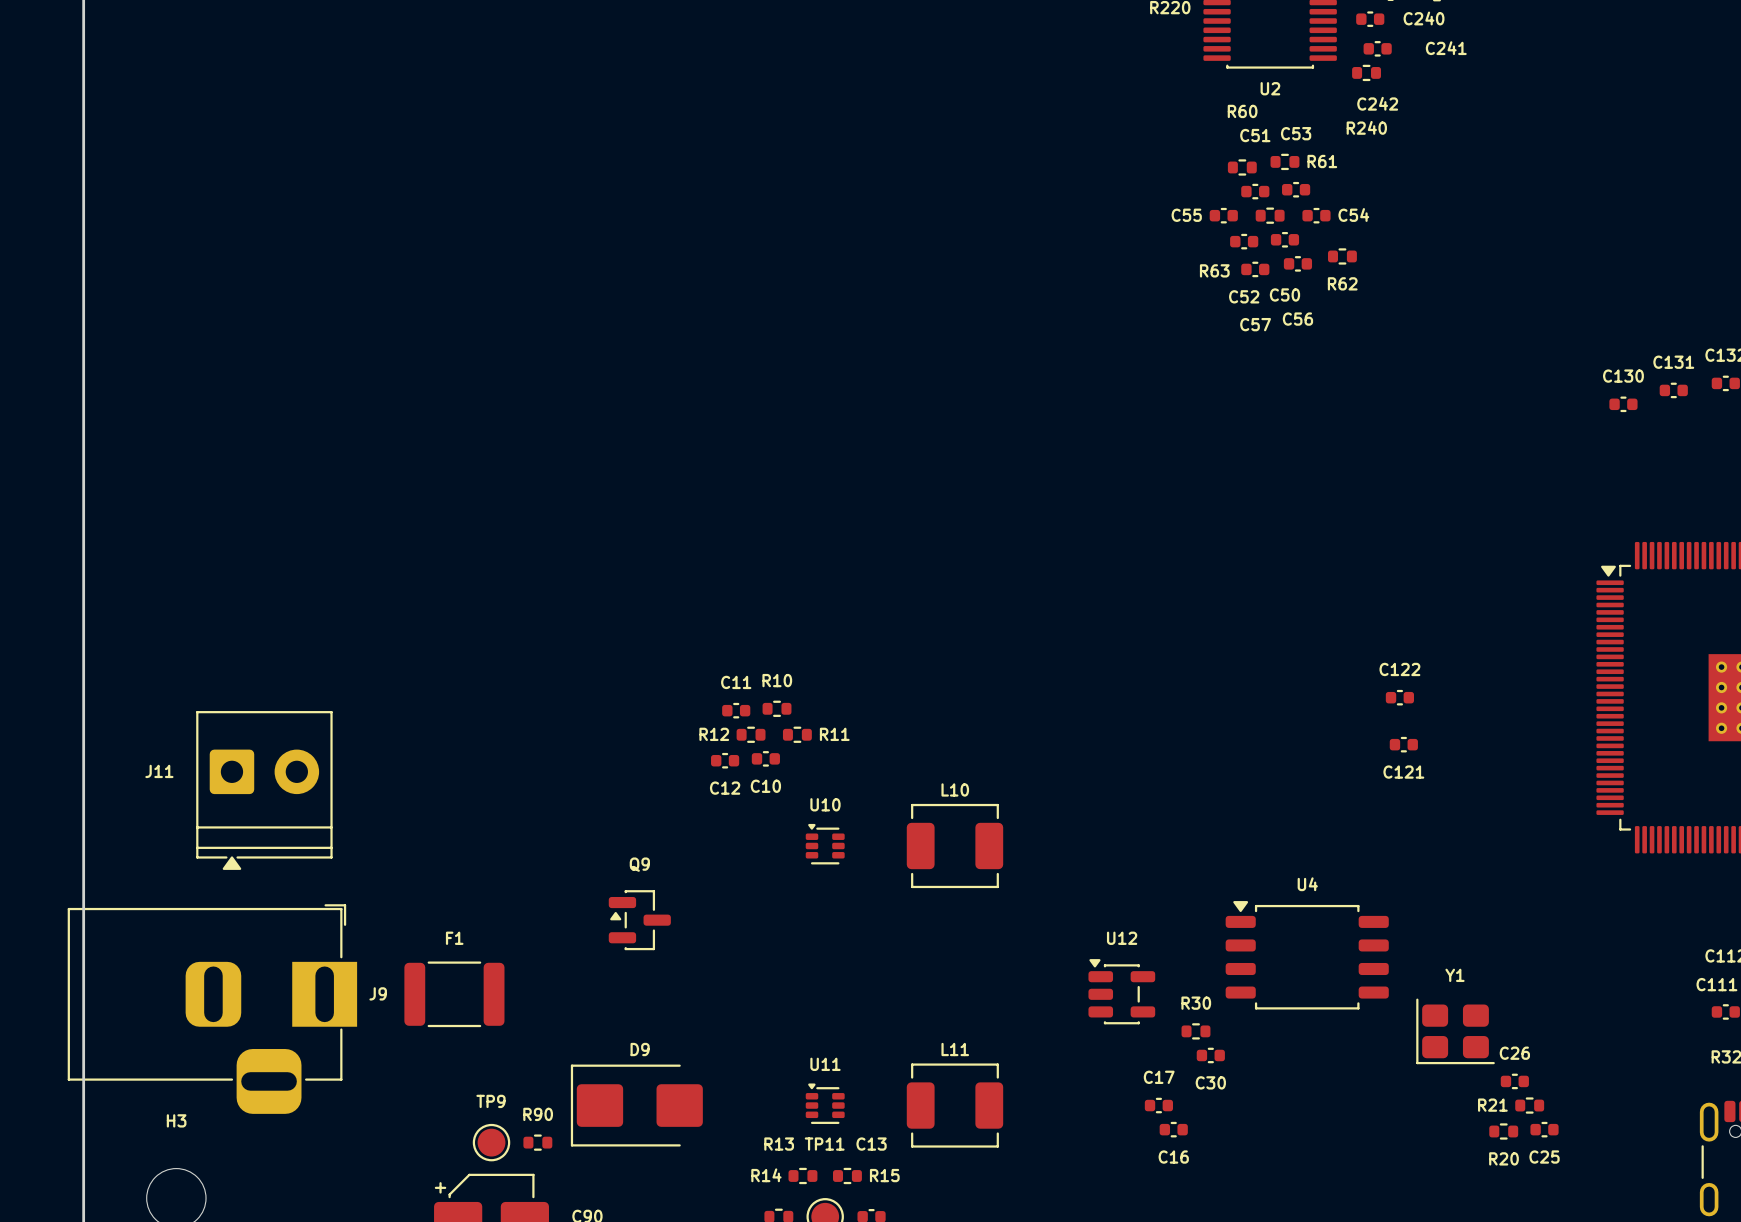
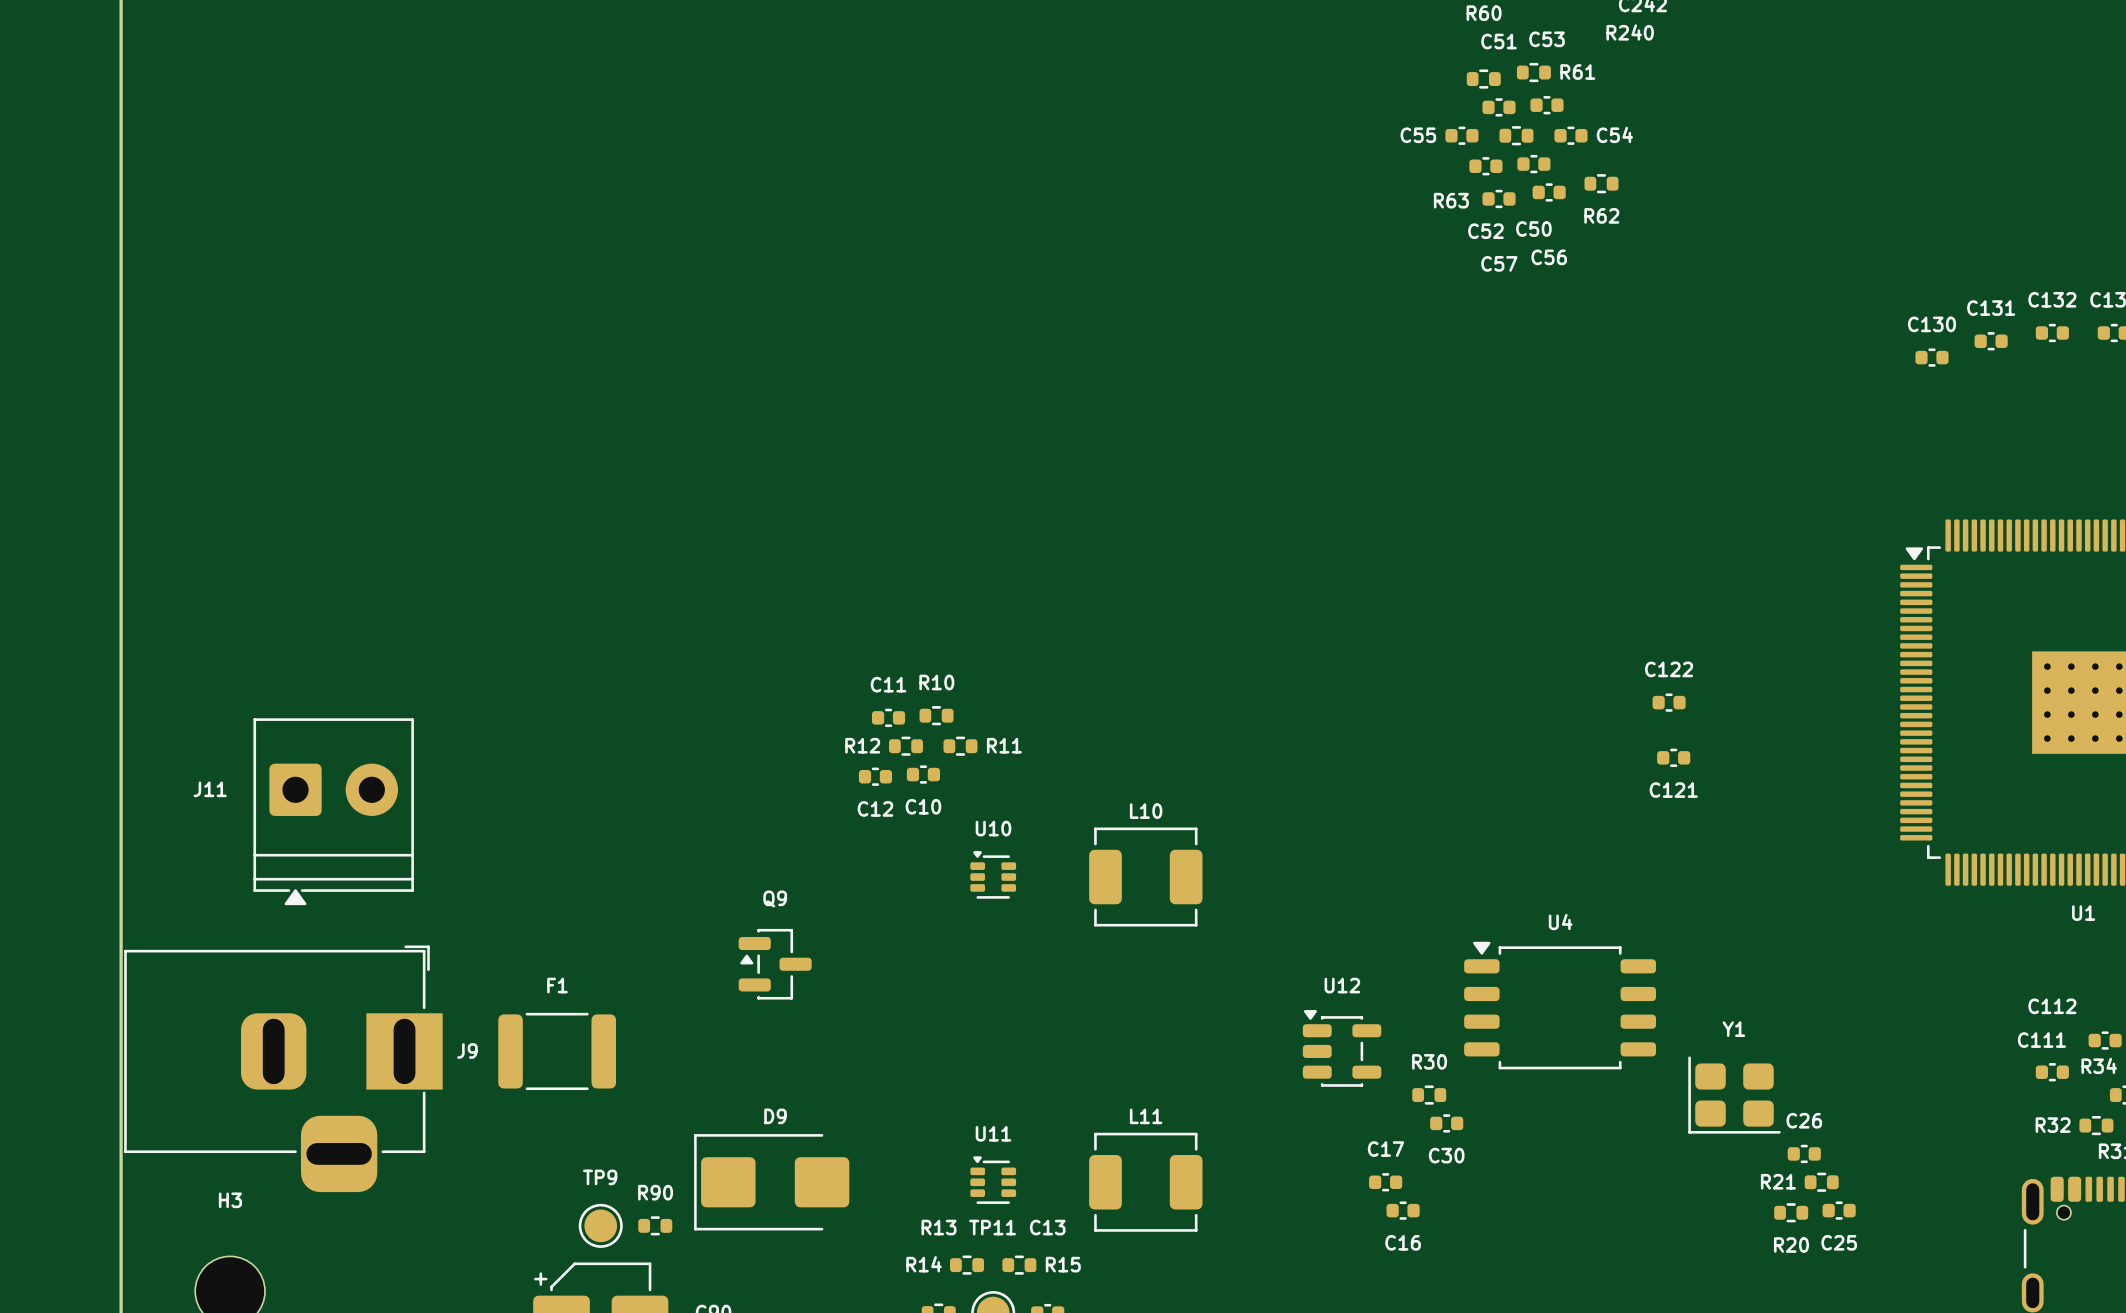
J9 footprint: [67, 904, 358, 1114] -> [124, 945, 443, 1193]

